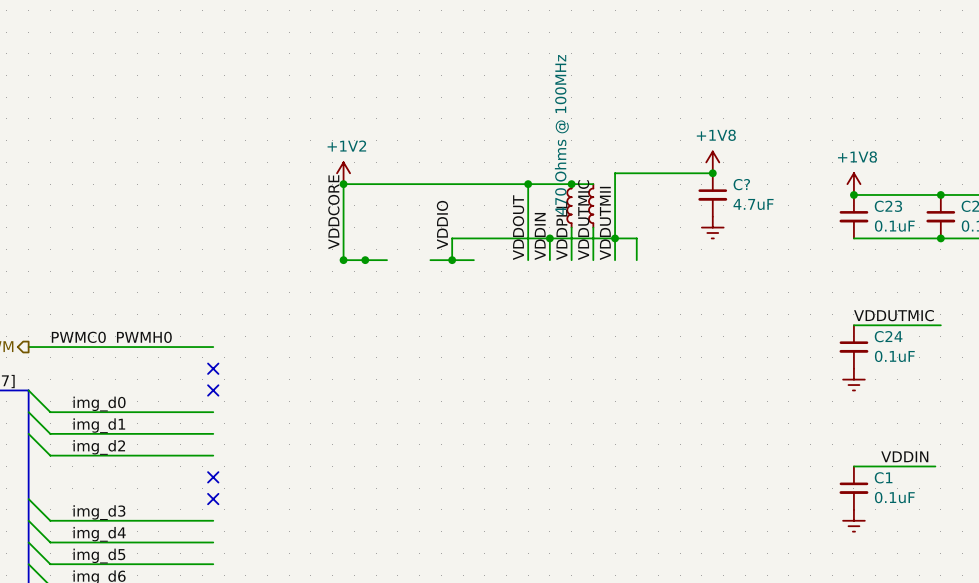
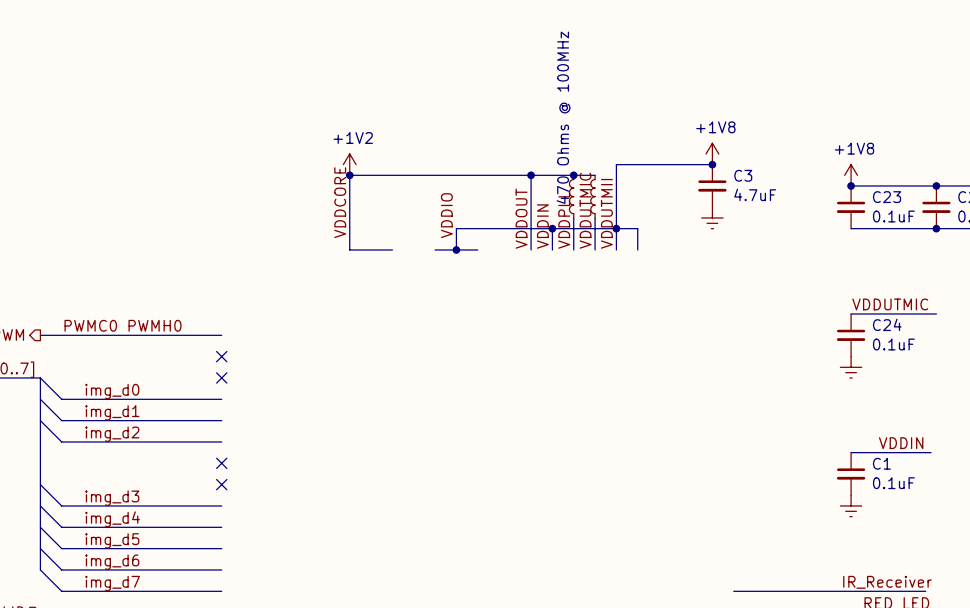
C? name: C? (741, 184) -> C3 (743, 175)
junction: (343, 260) -> none
junction: (365, 260) -> none

